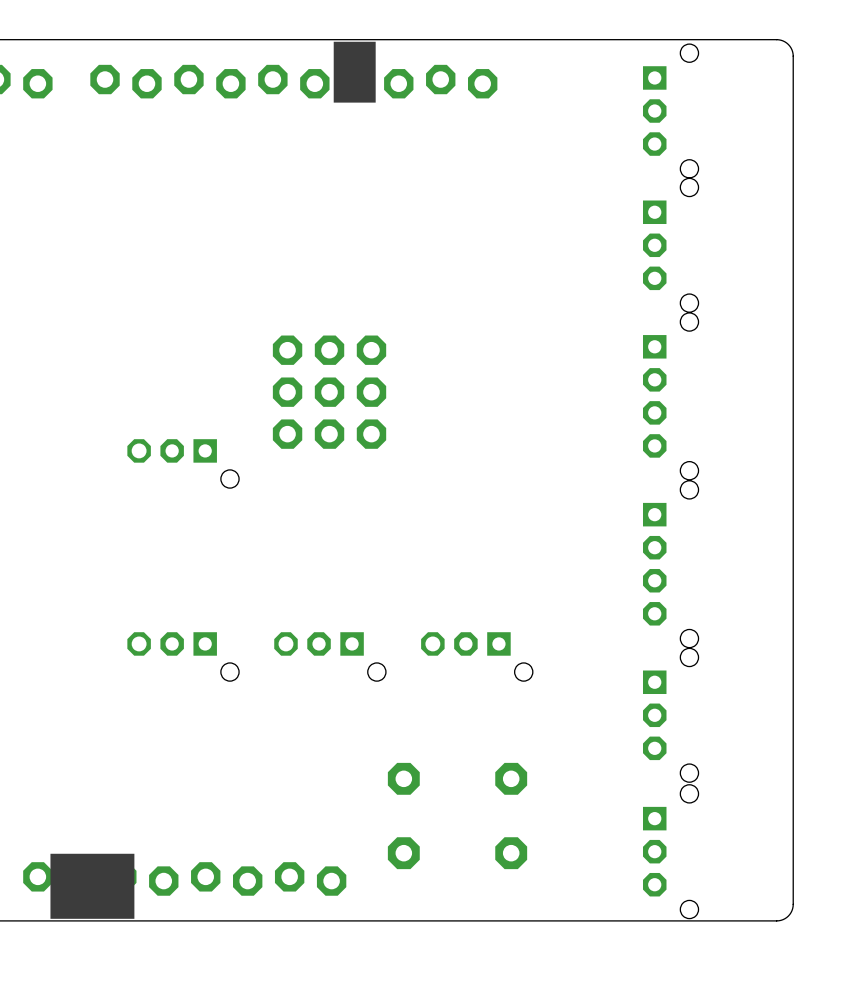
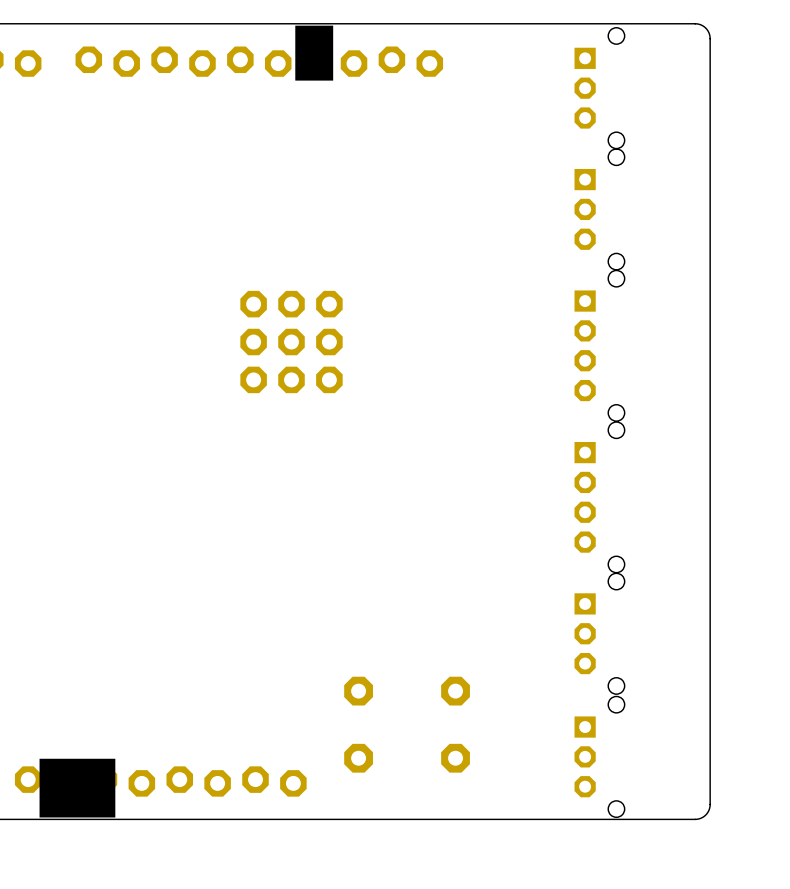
part: (183, 463) -> none
part: (183, 656) -> none
part: (330, 656) -> none
part: (476, 656) -> none

